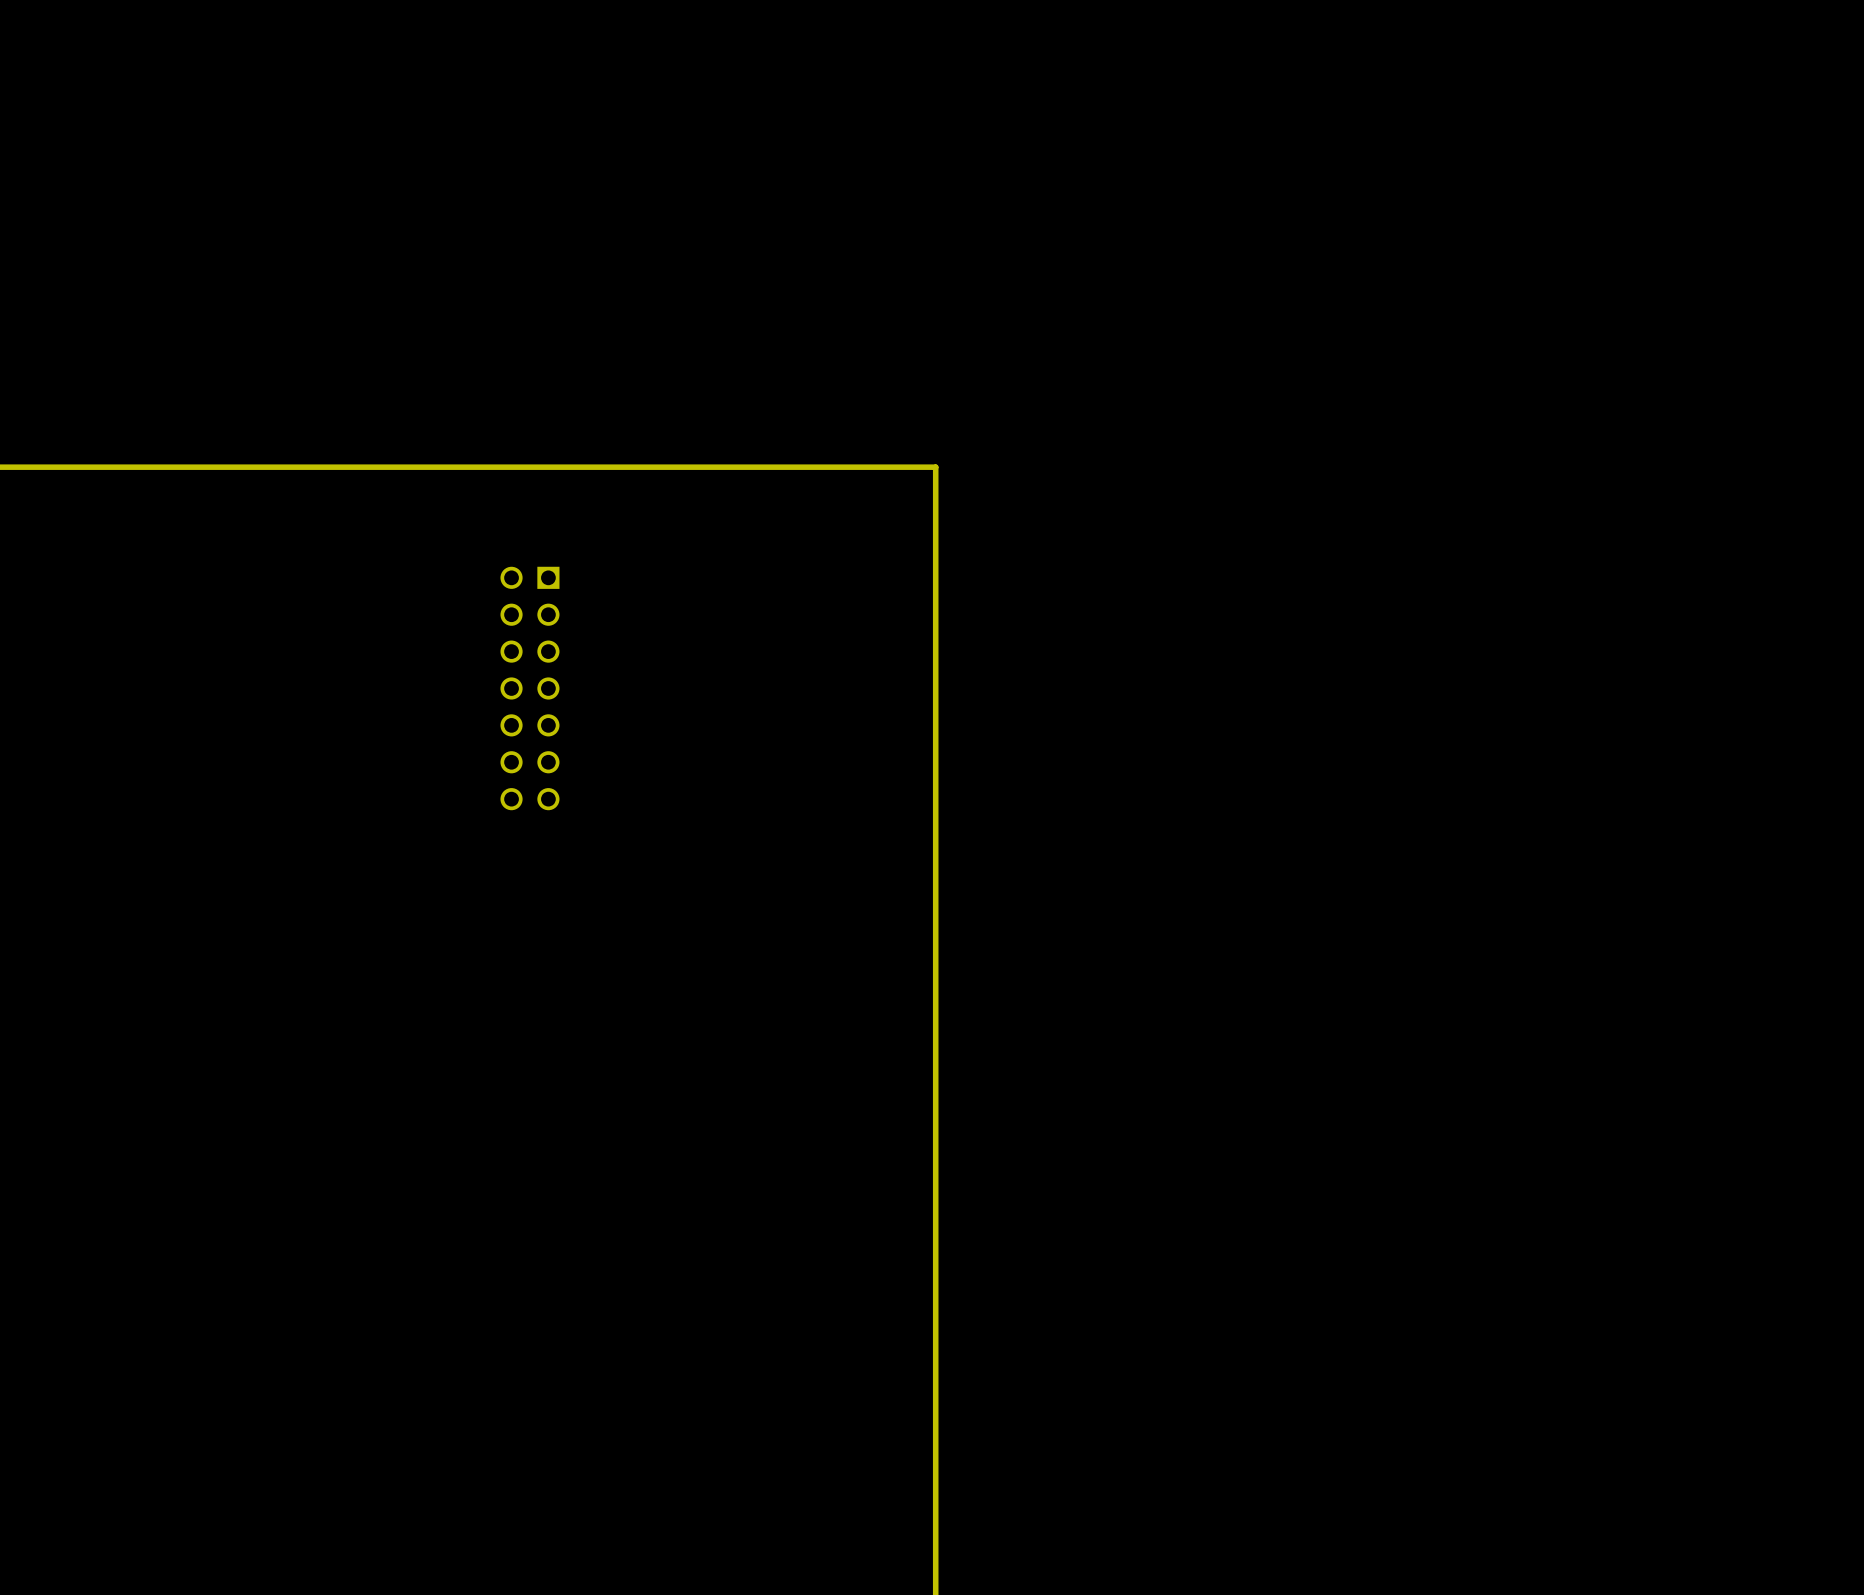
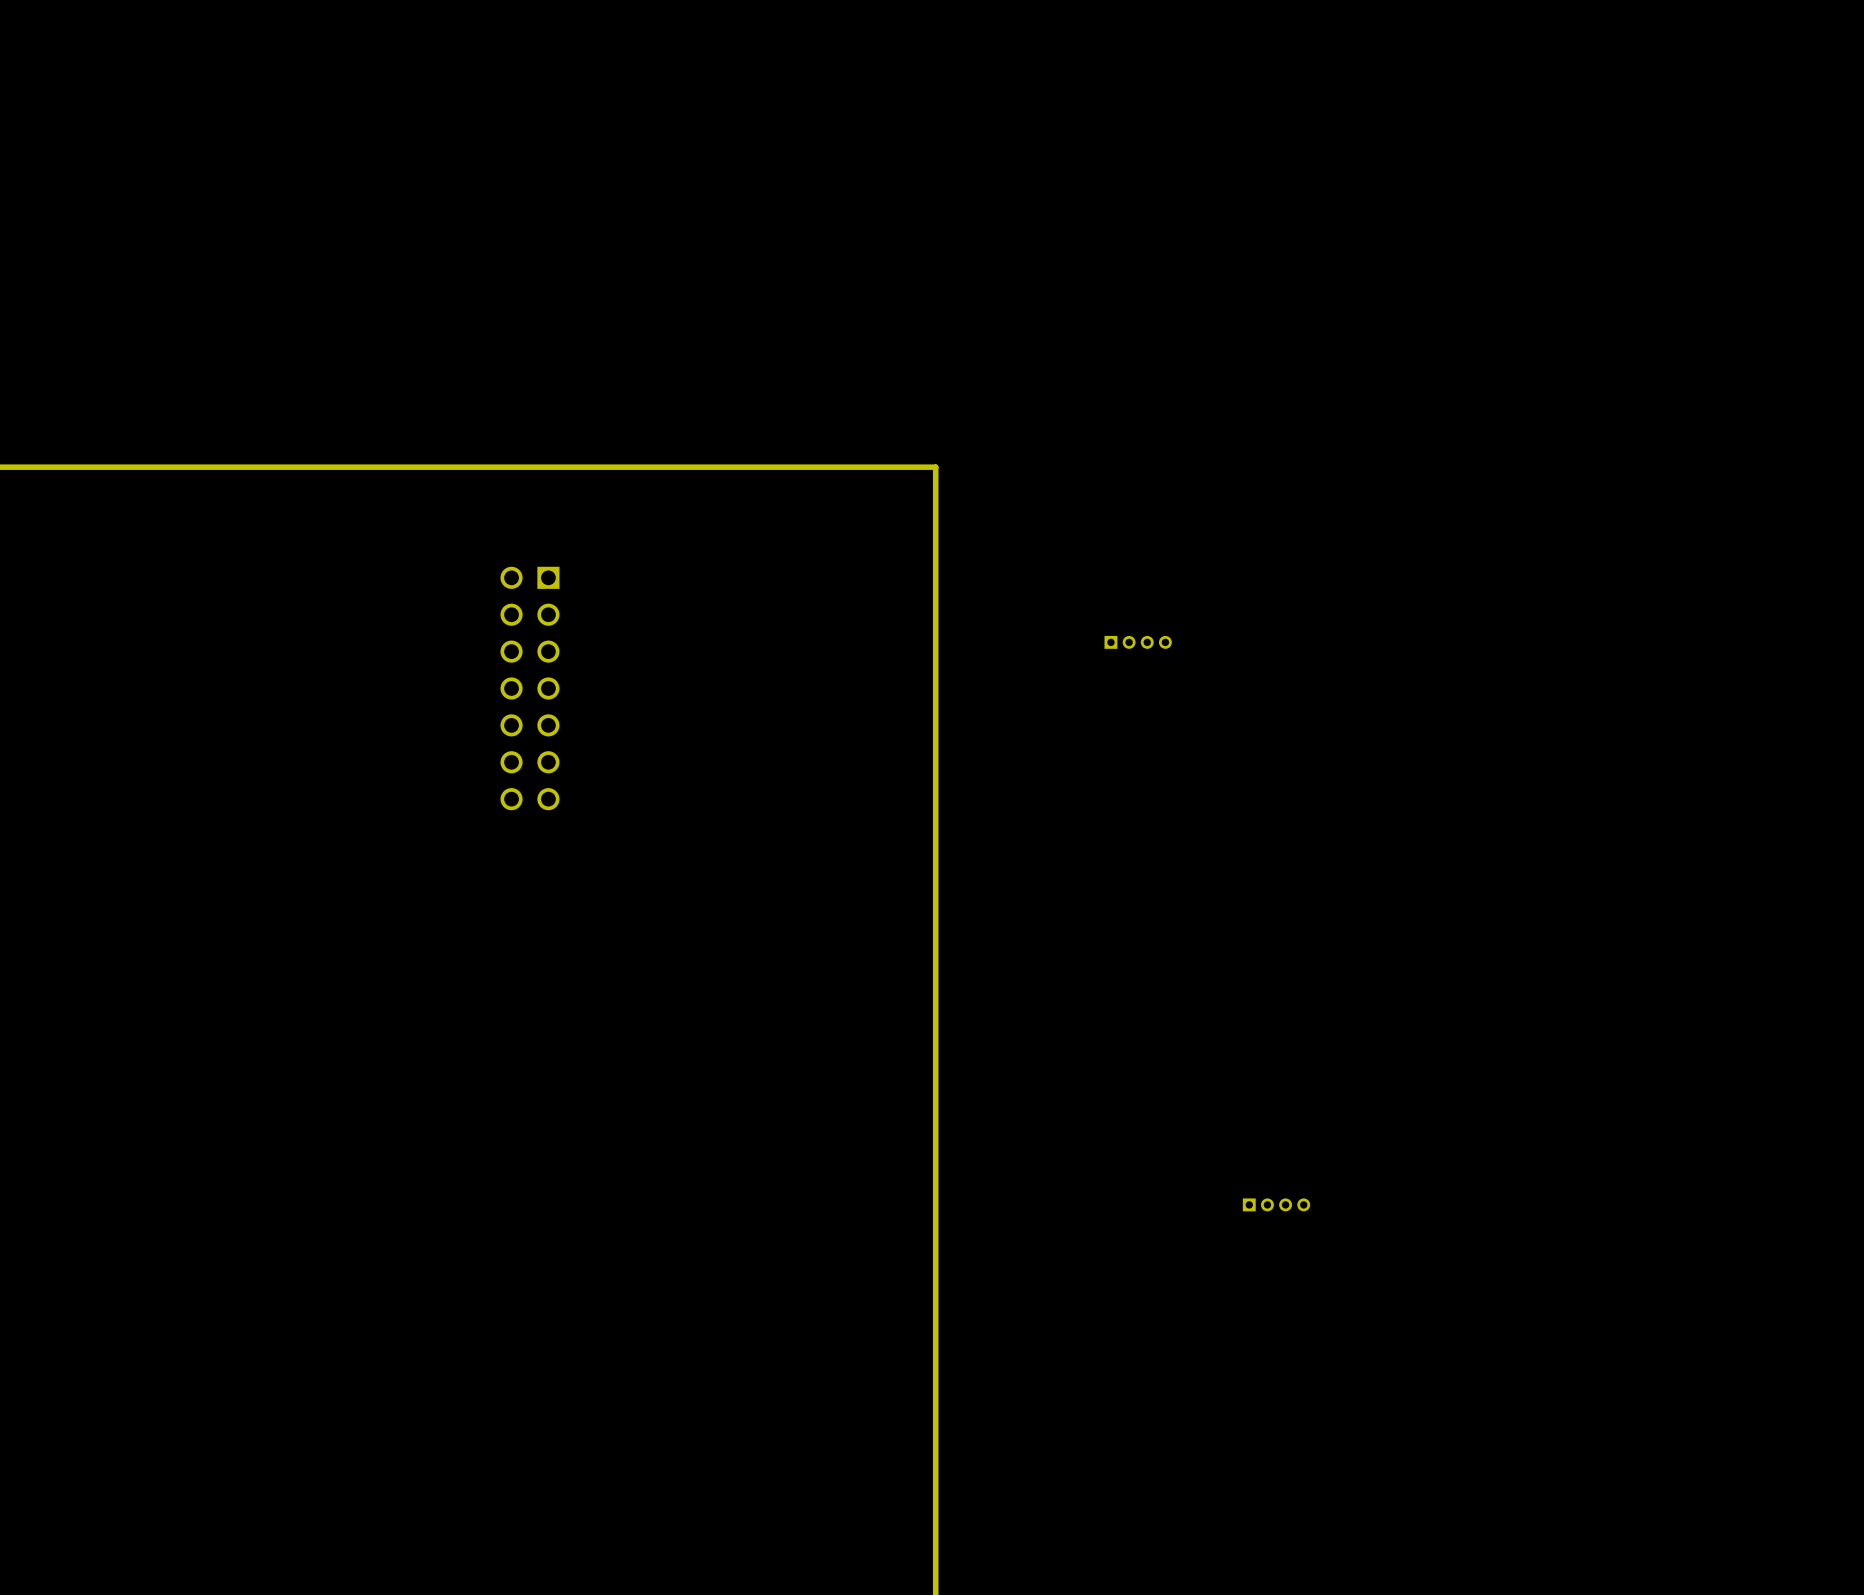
part: none -> (1138, 642)
part: none -> (1276, 1204)

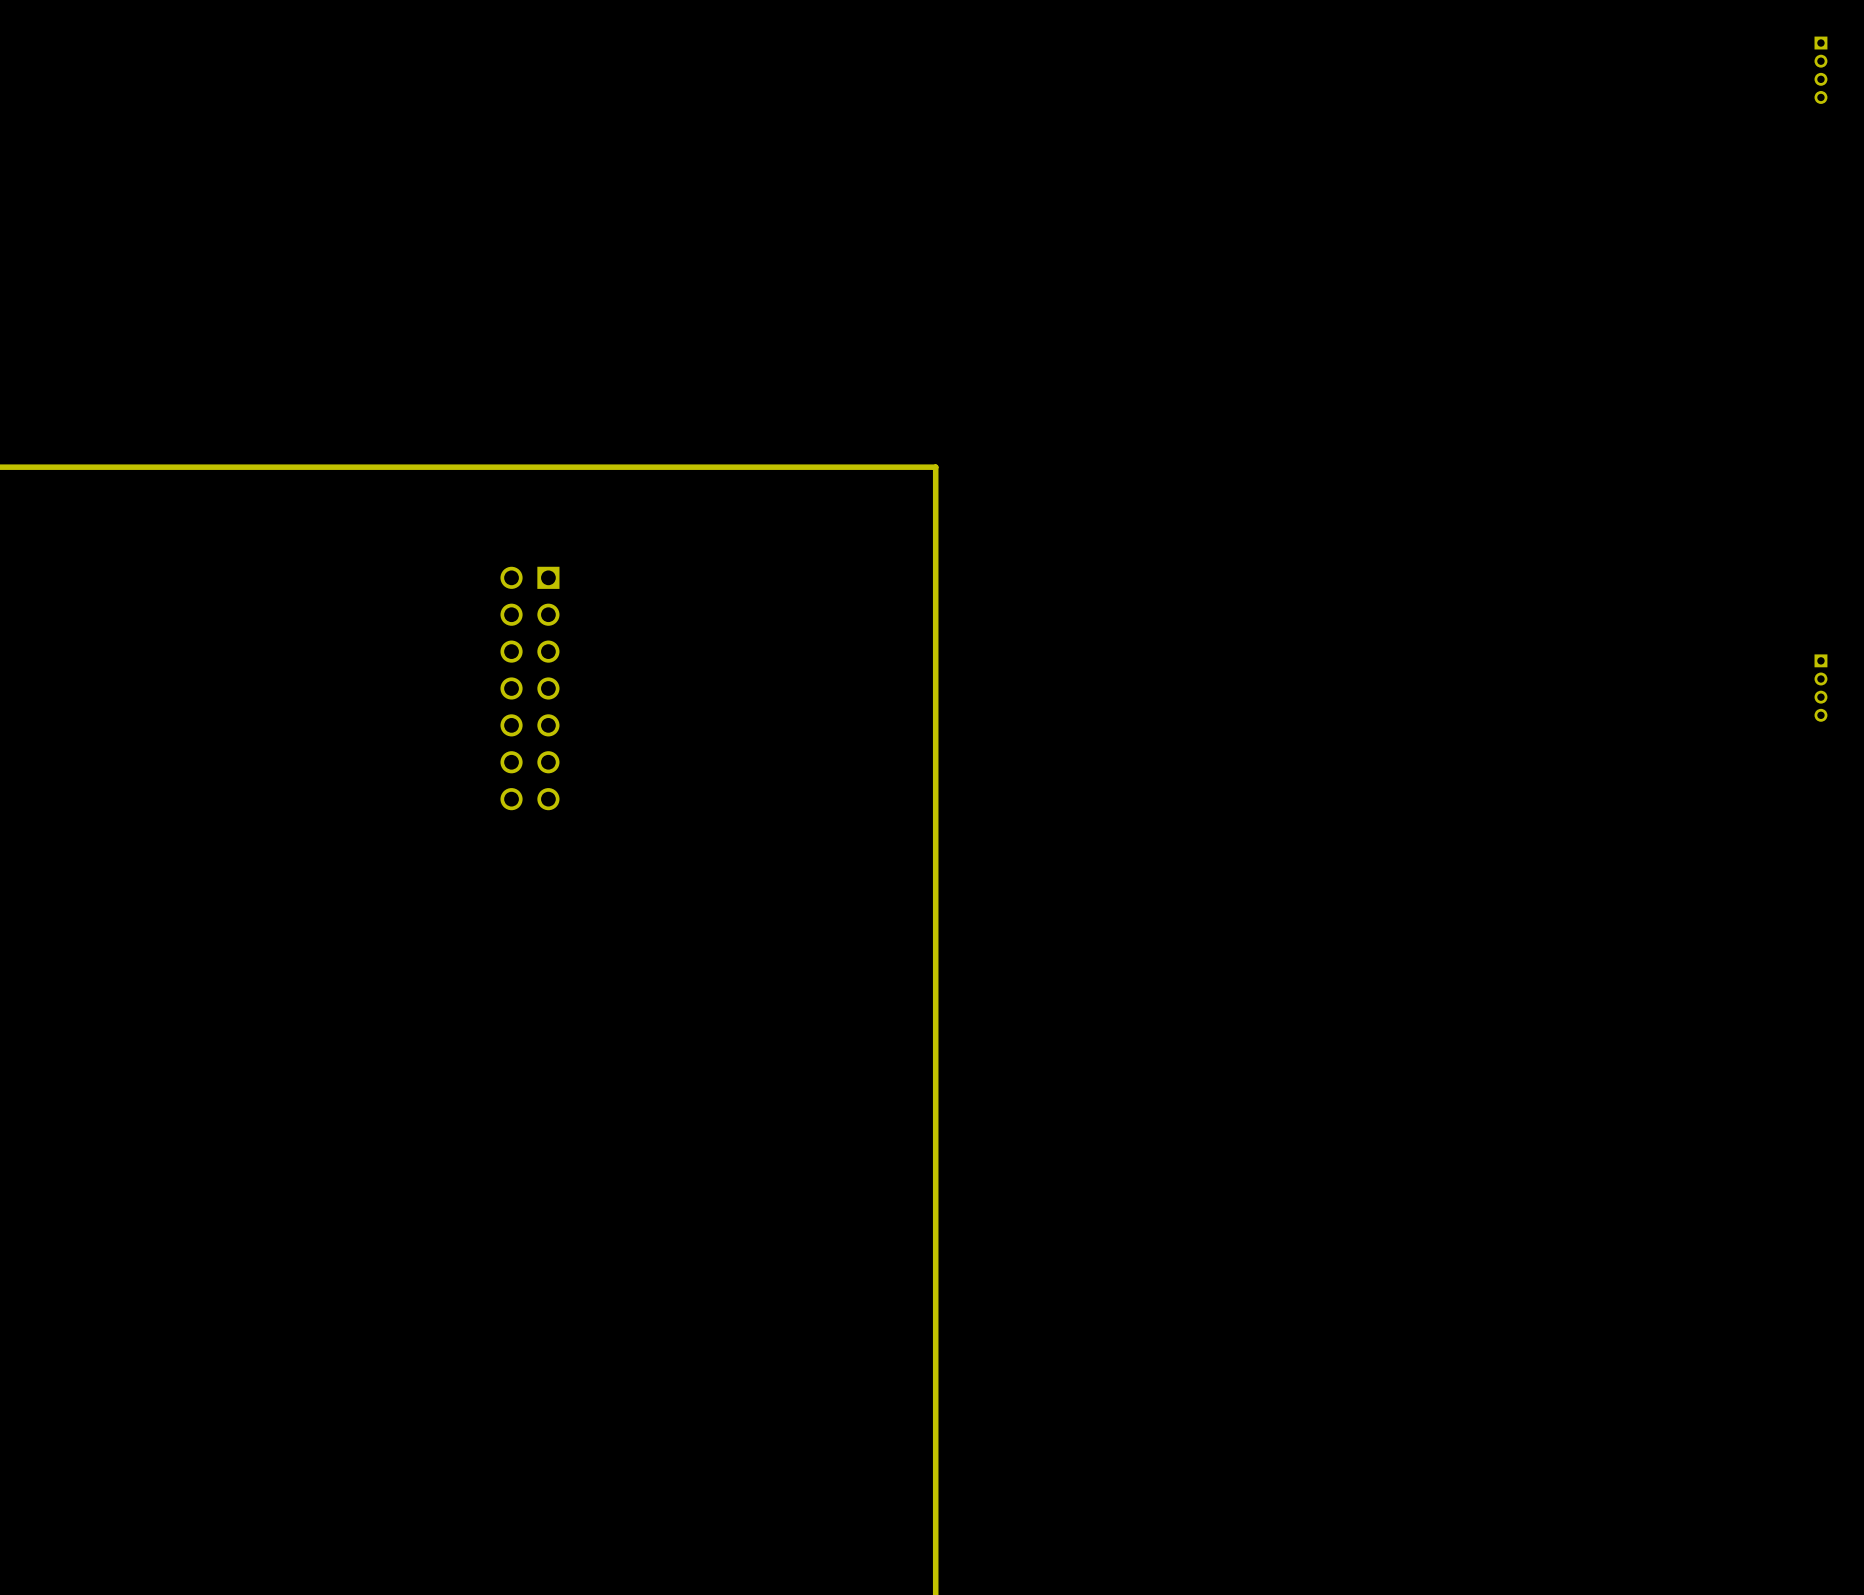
part: none -> (1820, 70)
part: (1138, 642) -> none
part: none -> (1820, 688)
part: (1276, 1204) -> none

